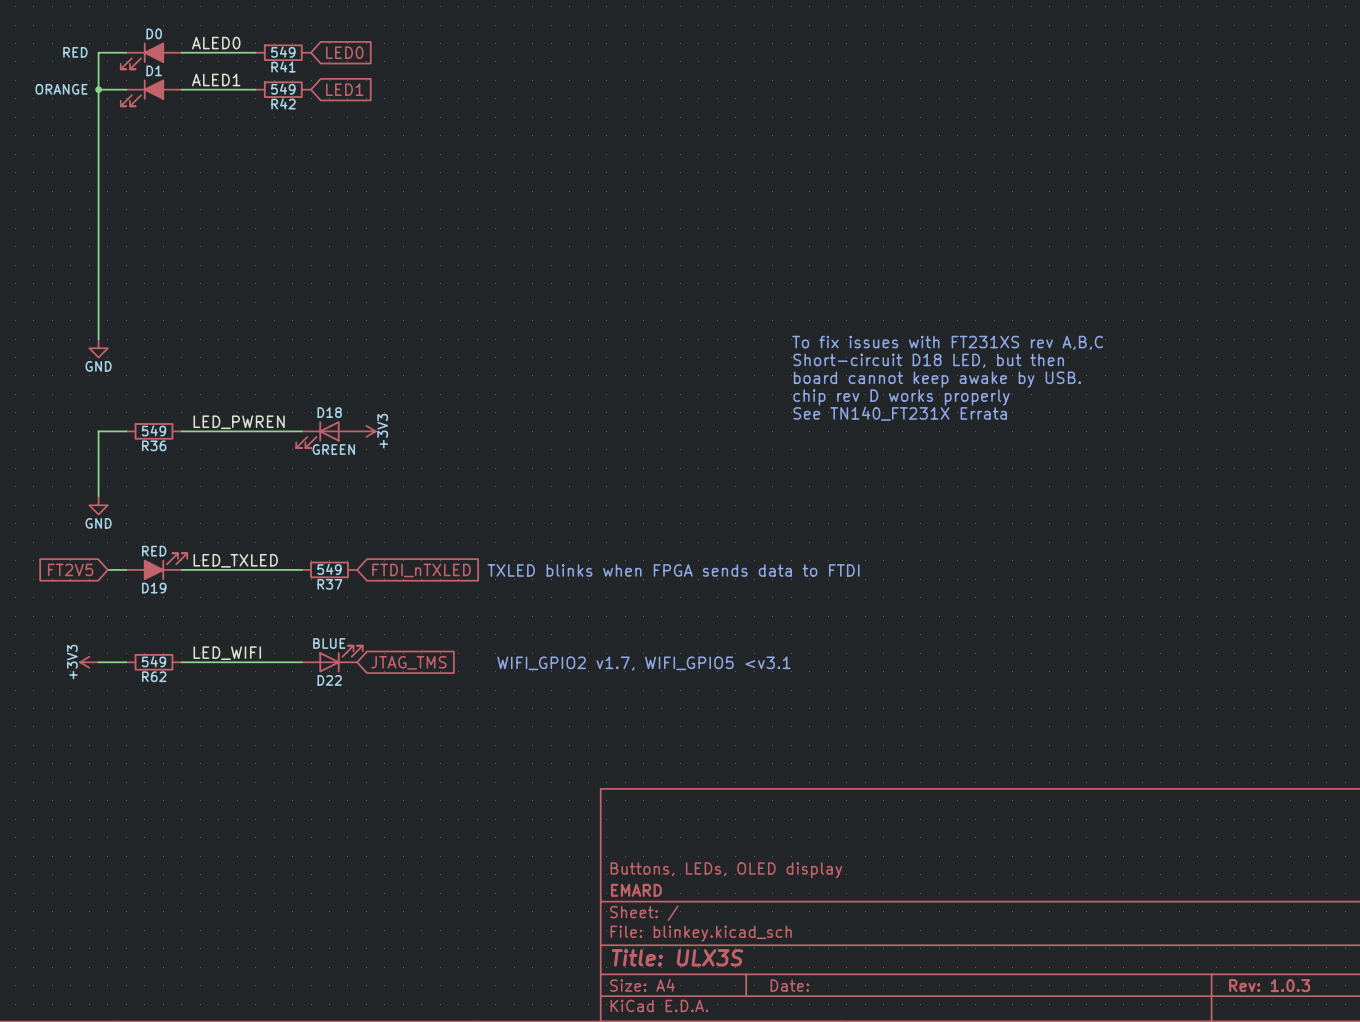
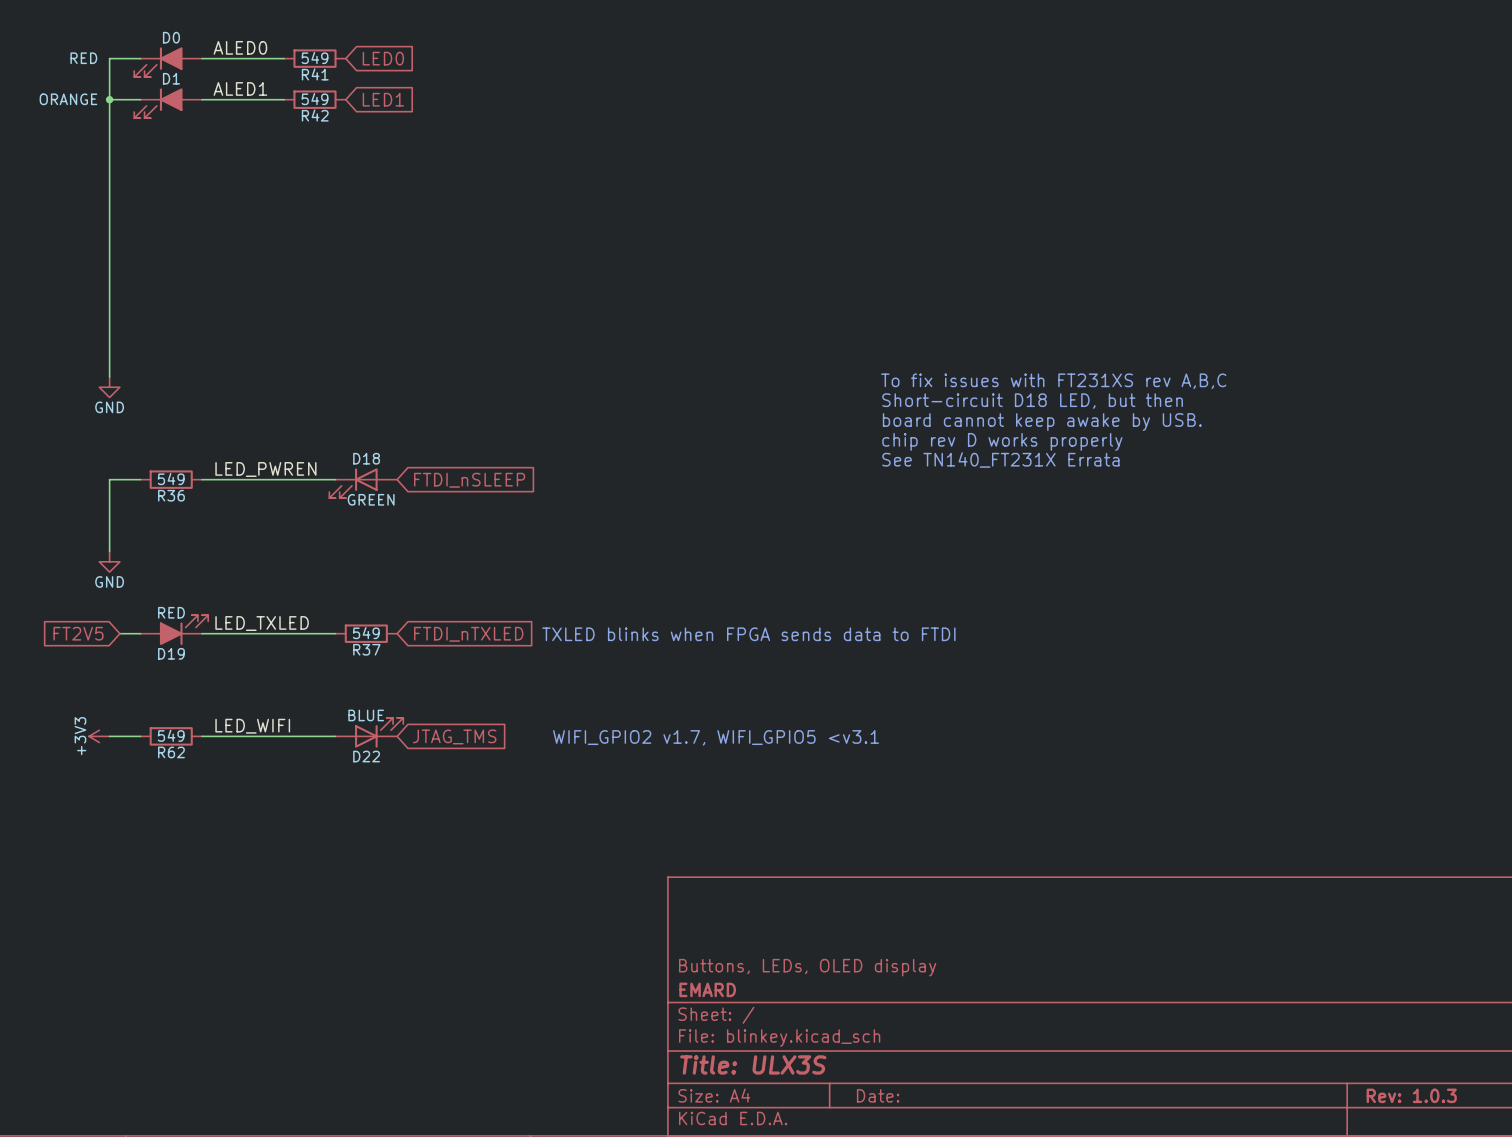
power symbol: +3V3 (366, 431) -> none
global label: none -> FTDI_nSLEEP (469, 480)

